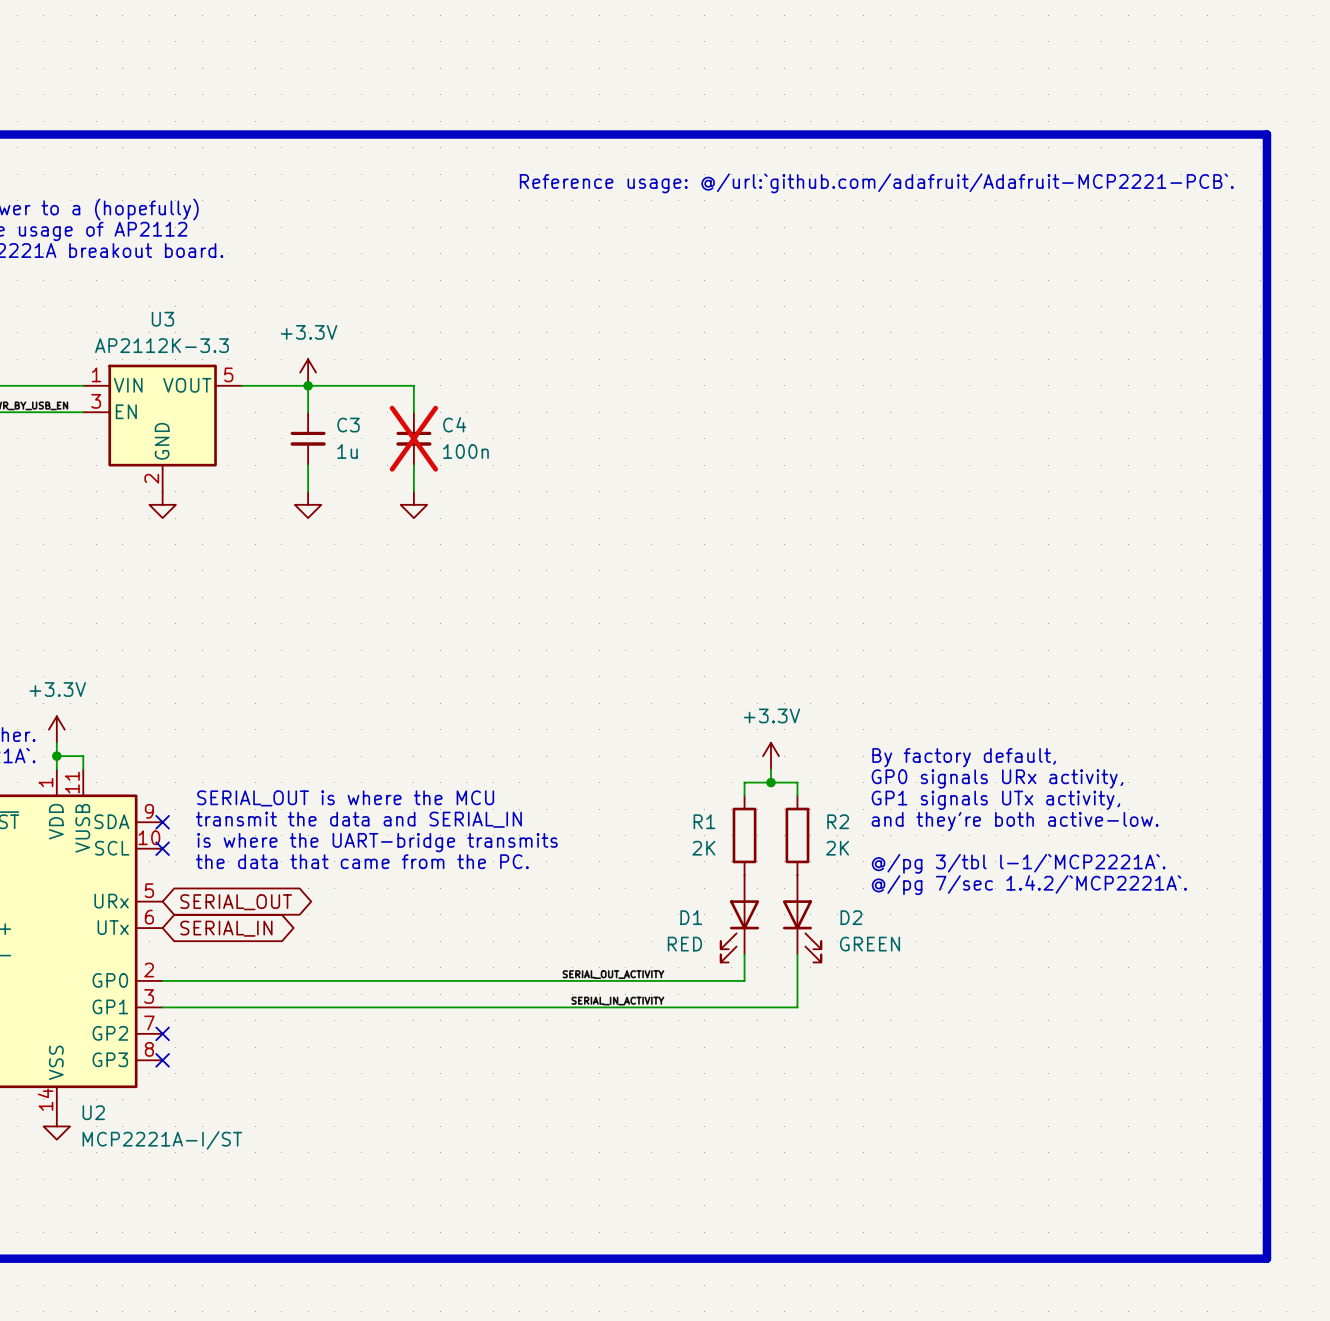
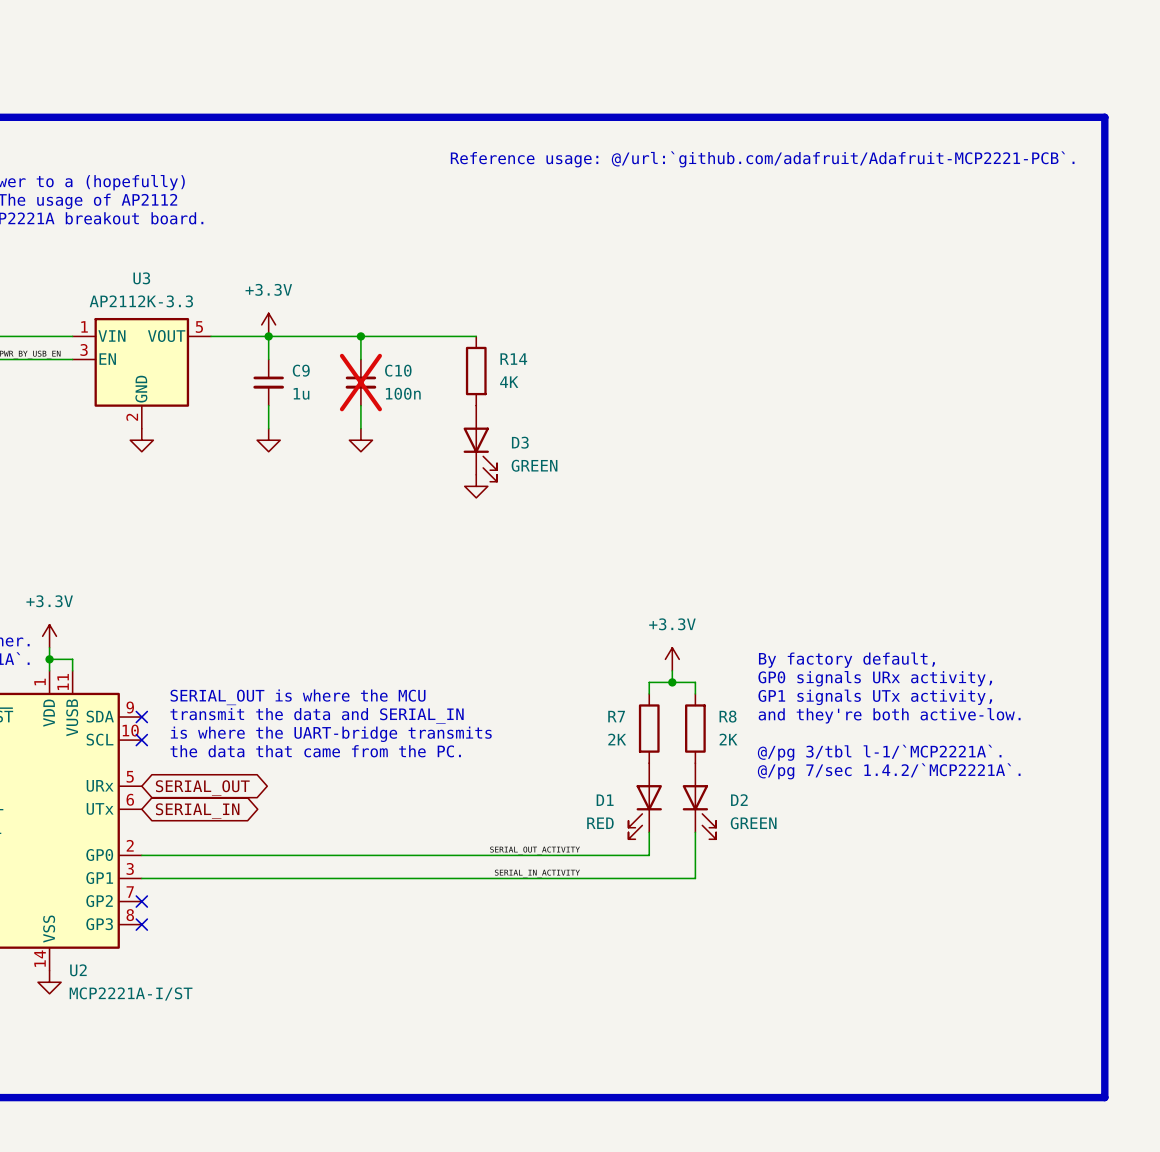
wire: none -> (360, 336) (476, 336)
junction: none -> (360, 336)
C4 name: C4 (454, 424) -> C10 (398, 370)
C3 name: C3 (348, 425) -> C9 (301, 370)
R14: none -> 4K (476, 371)
D3: none -> GREEN (480, 443)
power symbol: none -> (476, 486)
R1 name: R1 (704, 821) -> R7 (616, 716)
R2 name: R2 (838, 821) -> R8 (728, 716)

